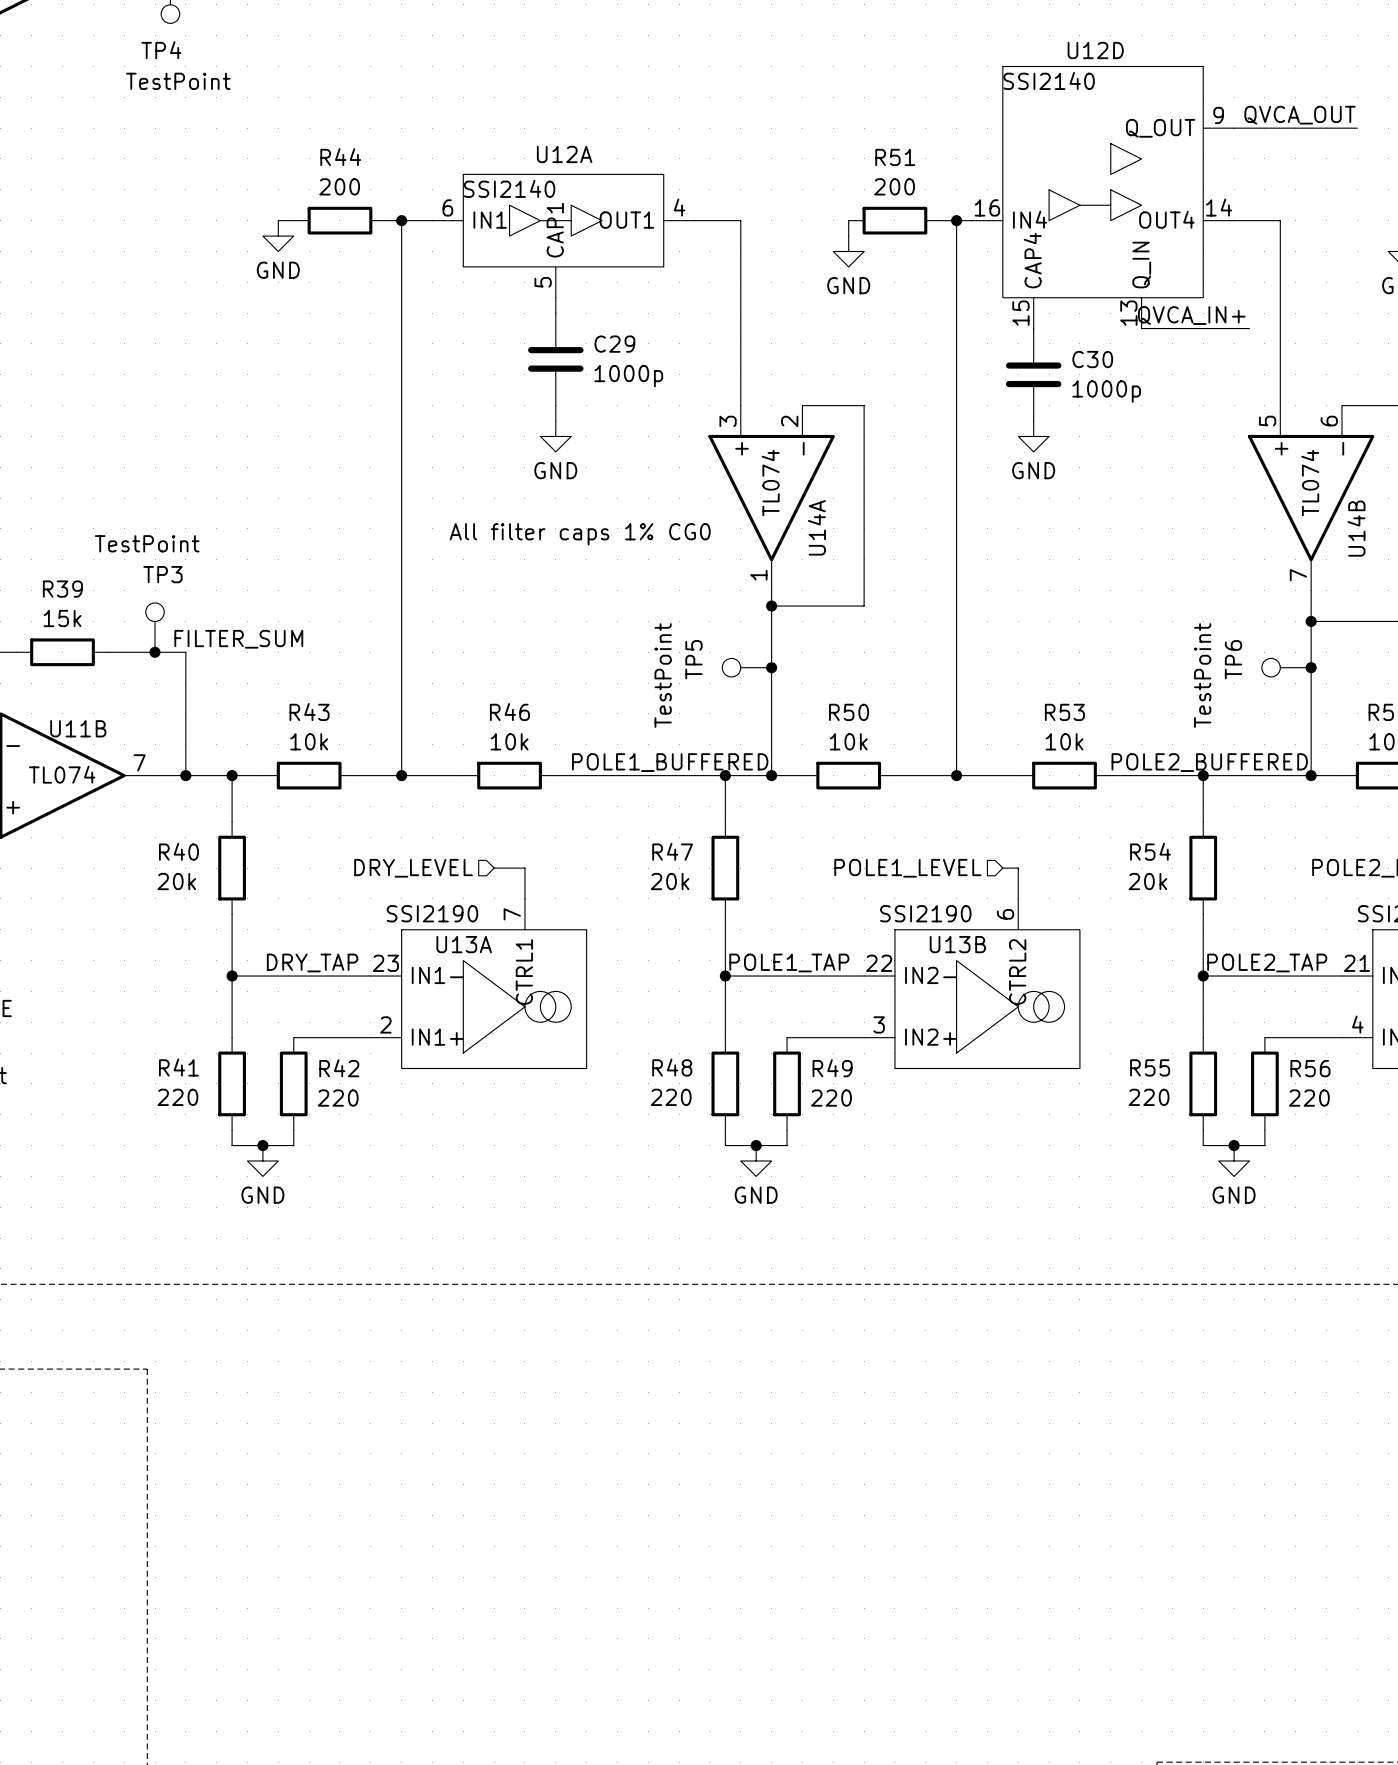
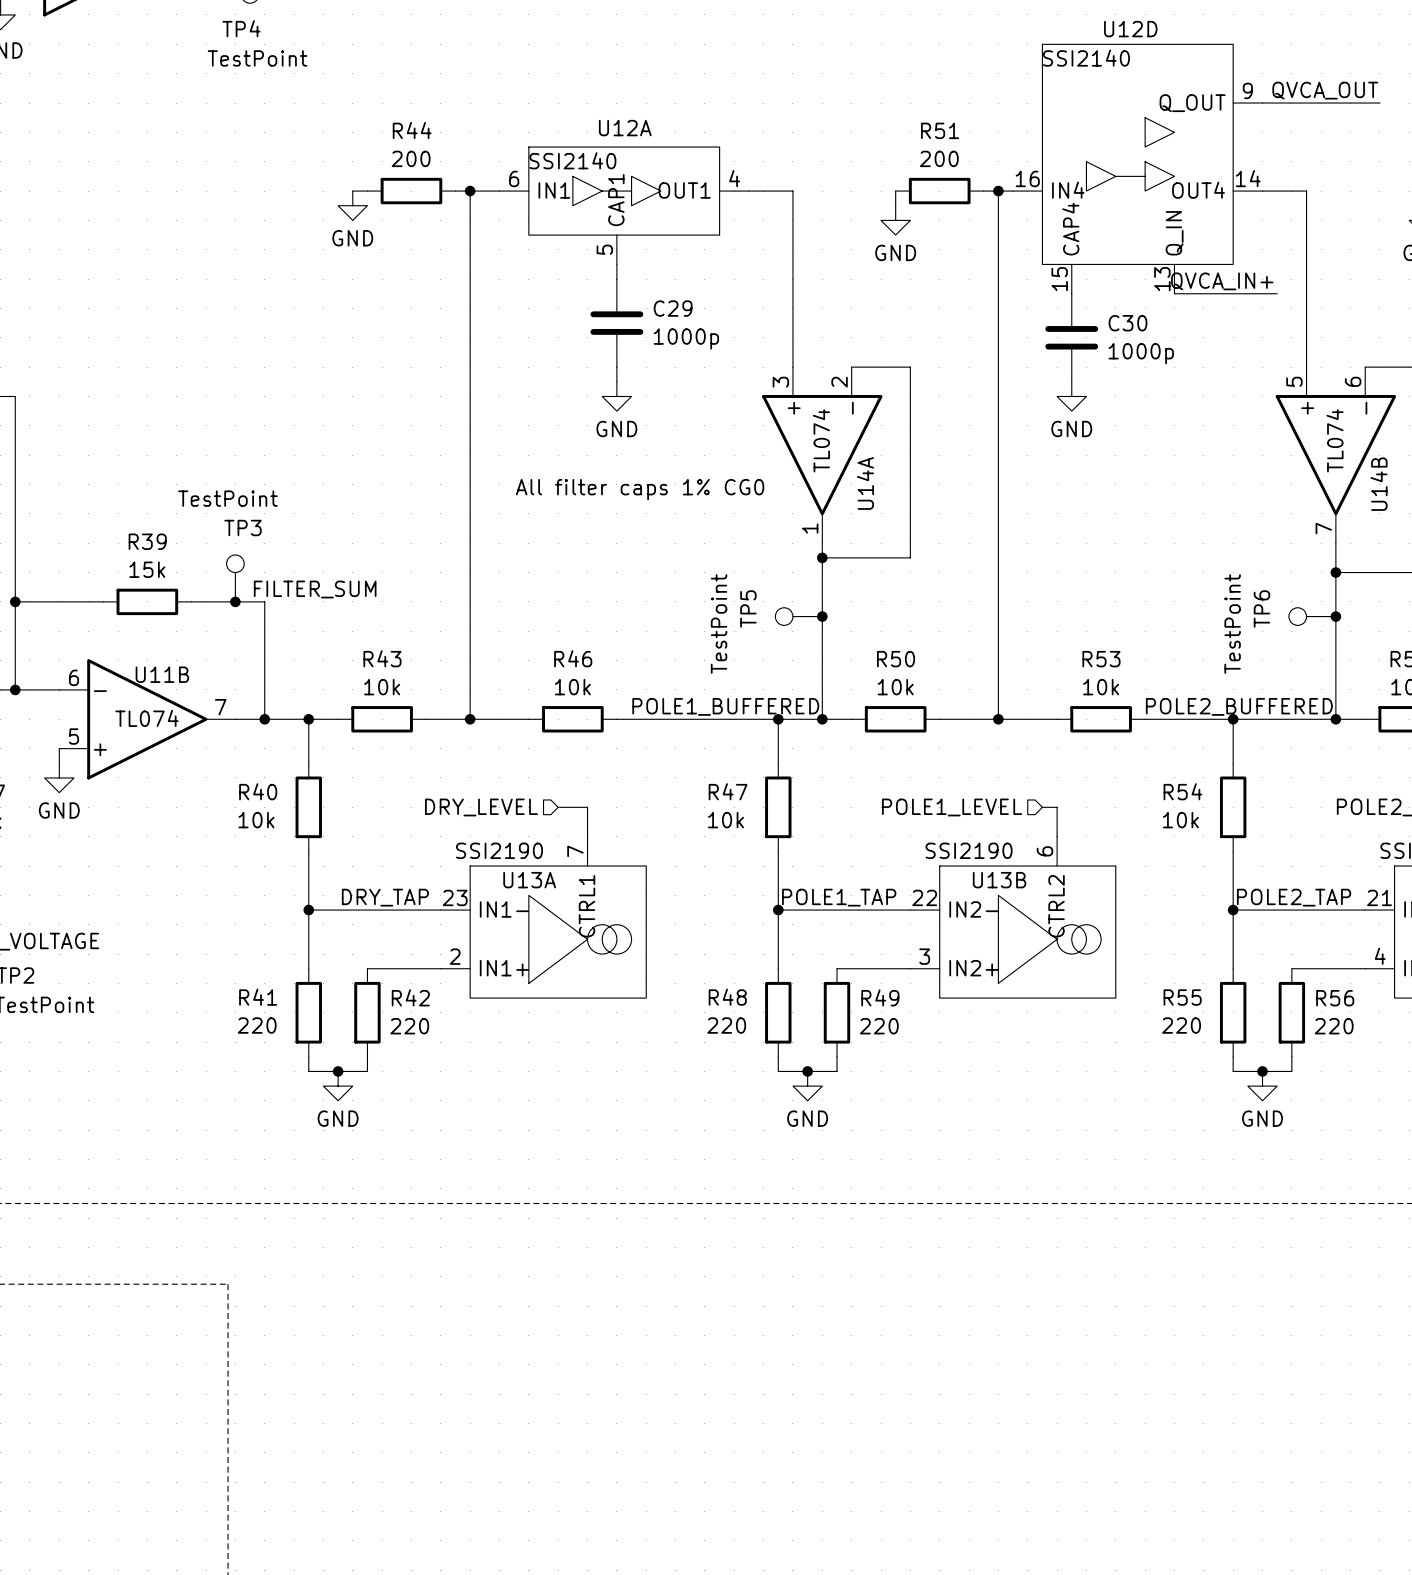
R40 value: 20k (176, 881) -> 10k (256, 820)
R47 value: 20k (670, 881) -> 10k (726, 820)
R54 value: 20k (1147, 881) -> 10k (1180, 820)

